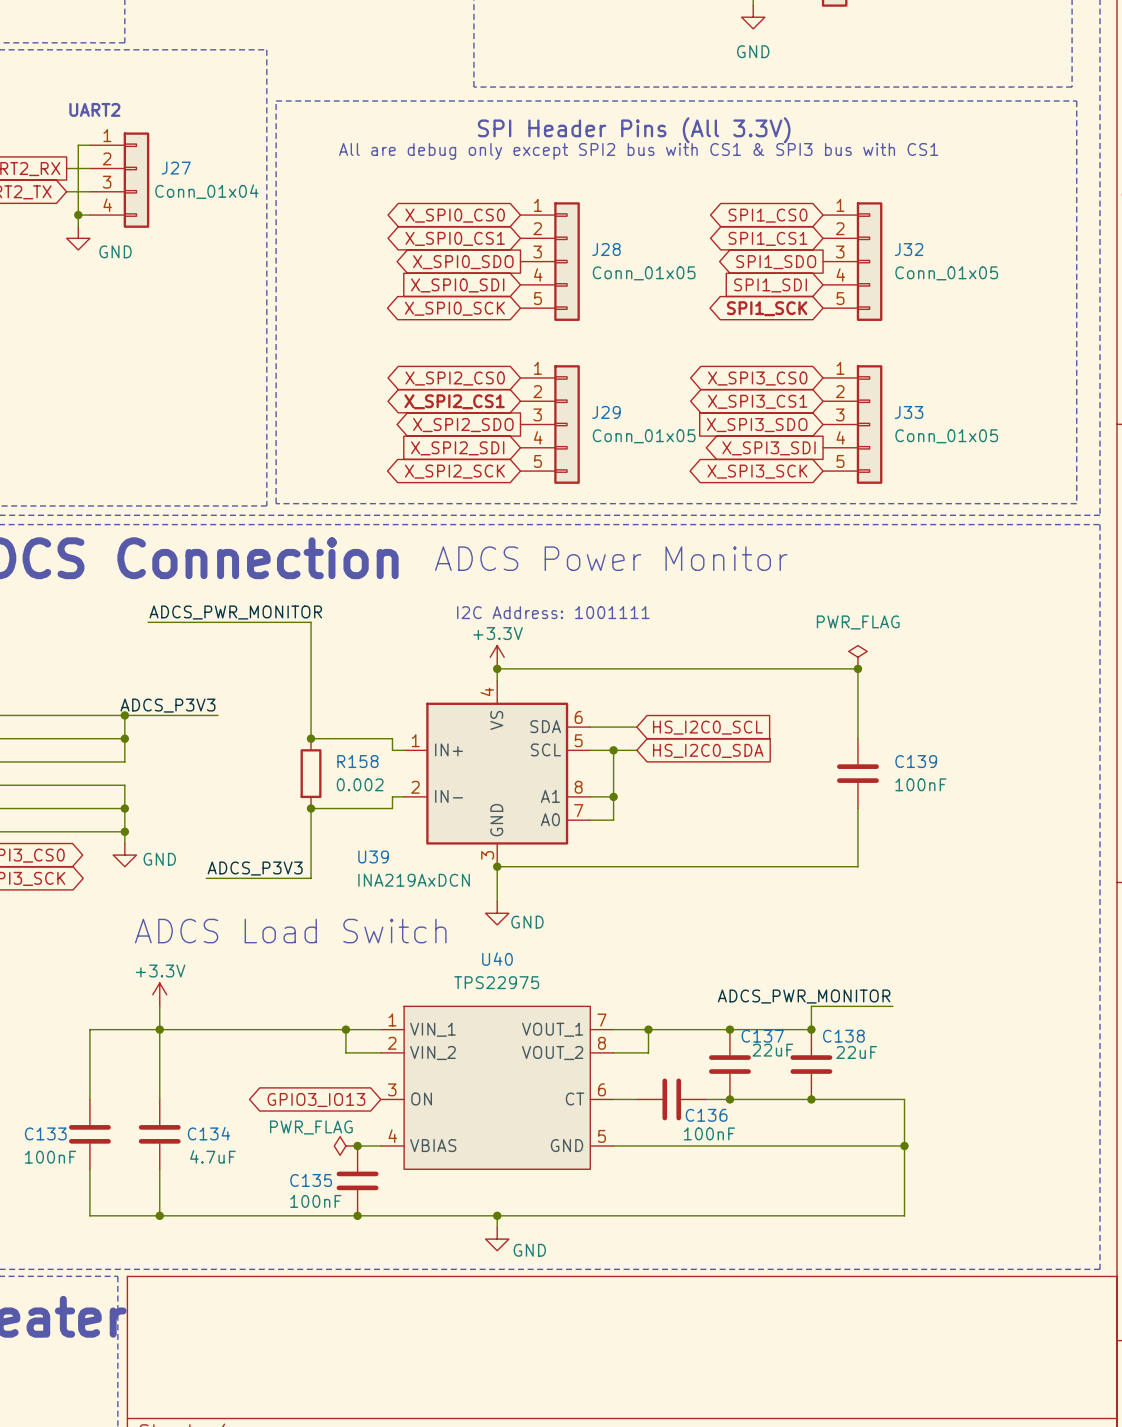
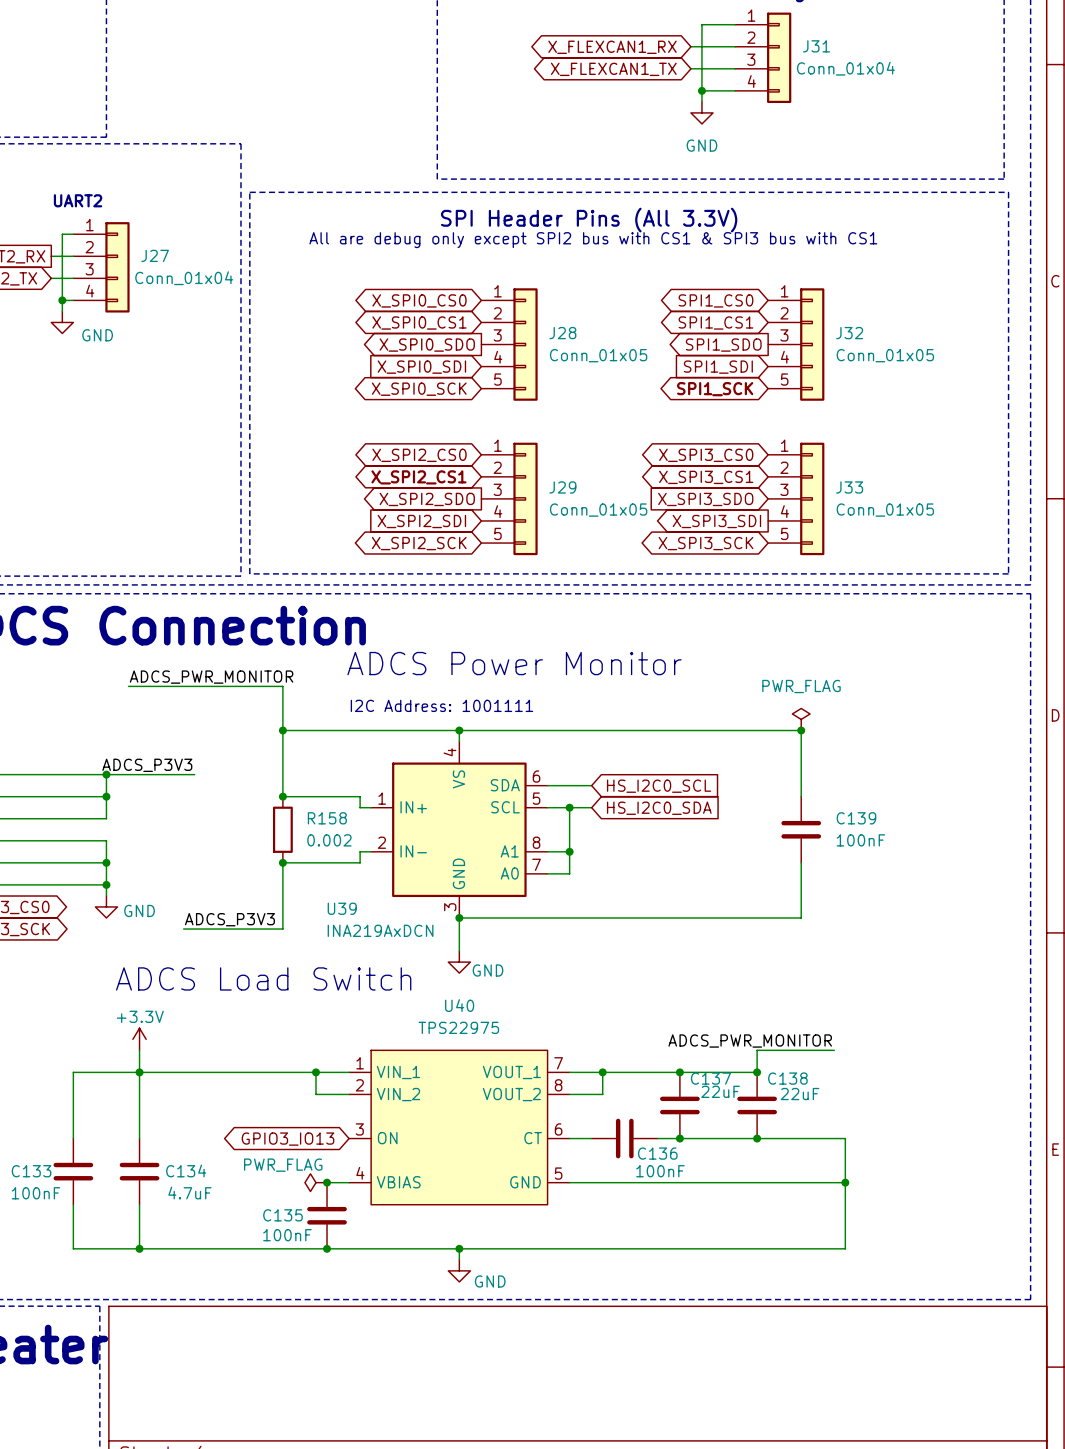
text position: ADCS Power Monitor (611, 558) -> ADCS Power Monitor (514, 663)
text position: I2C Address: 1001111 (553, 612) -> I2C Address: 1001111 (441, 705)
power symbol: +3.3V (497, 657) -> none
wire: none -> (282, 730) (459, 730)
junction: none -> (282, 730)

